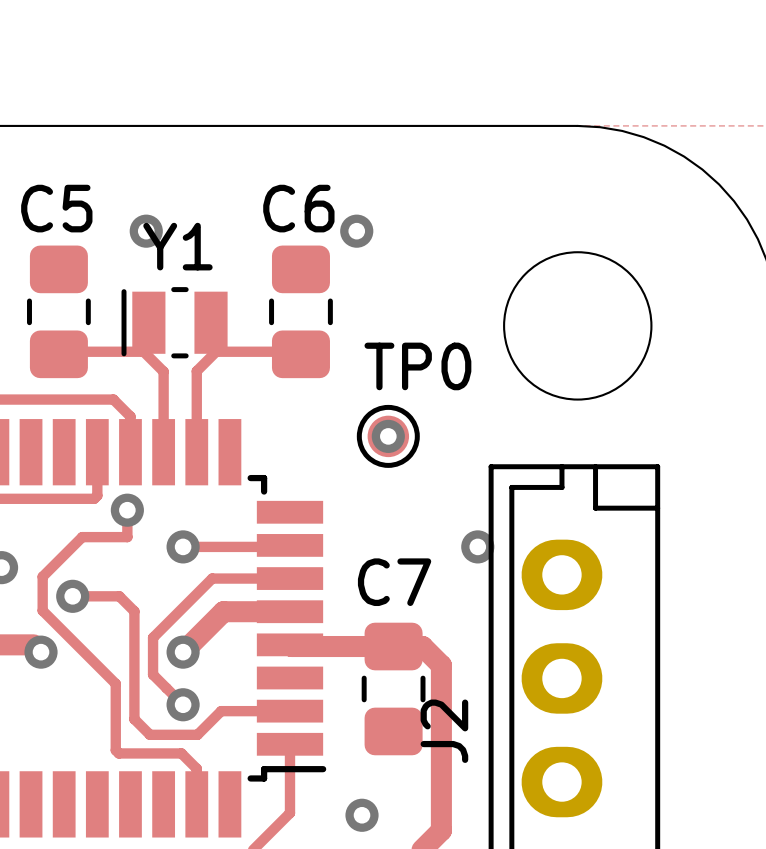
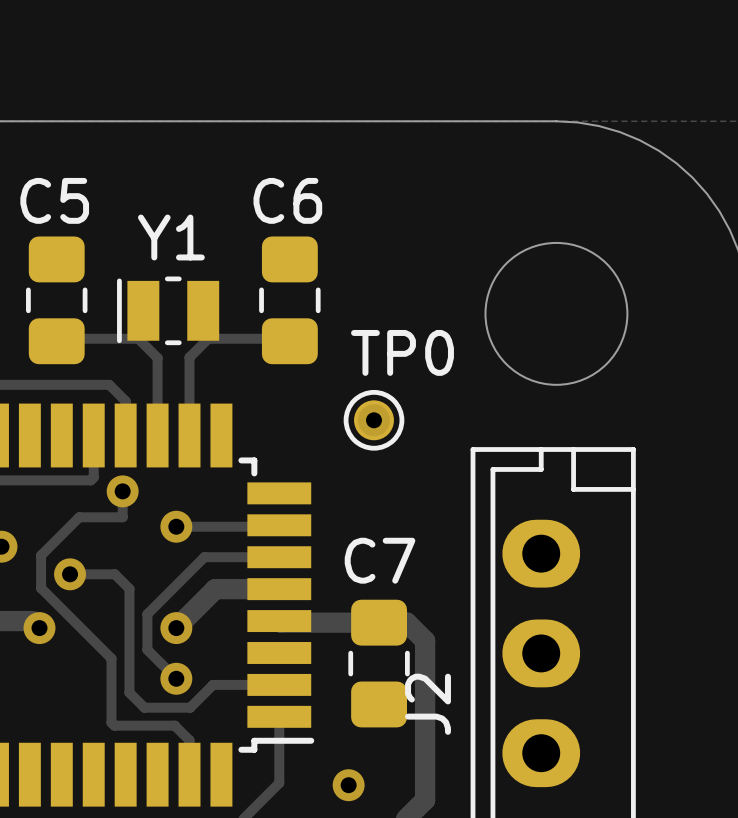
via: (146, 231) -> none
via: (356, 231) -> none
via: (477, 546) -> none

